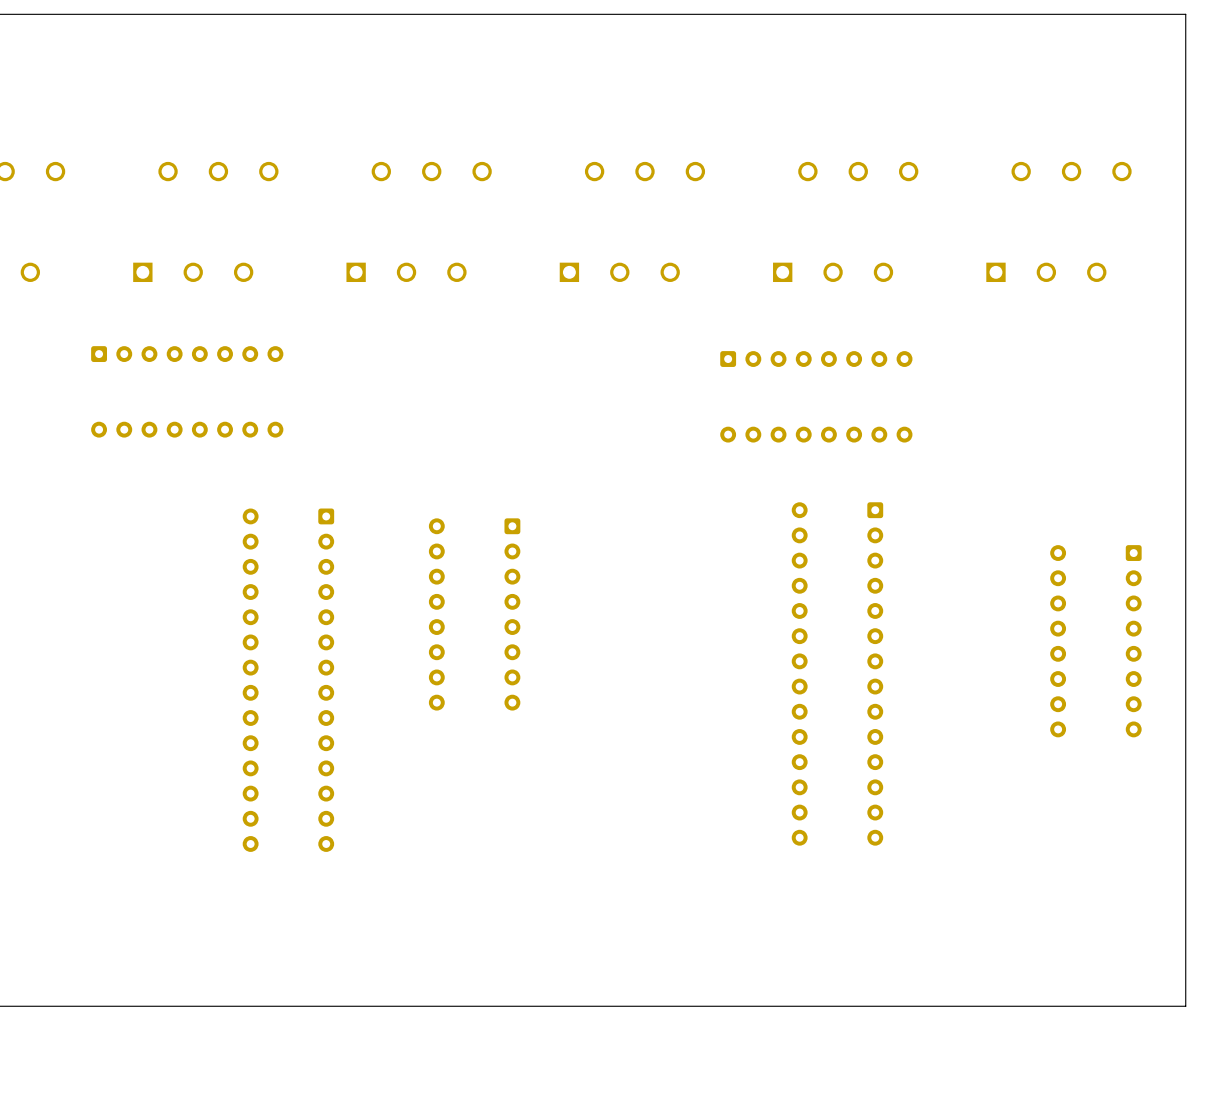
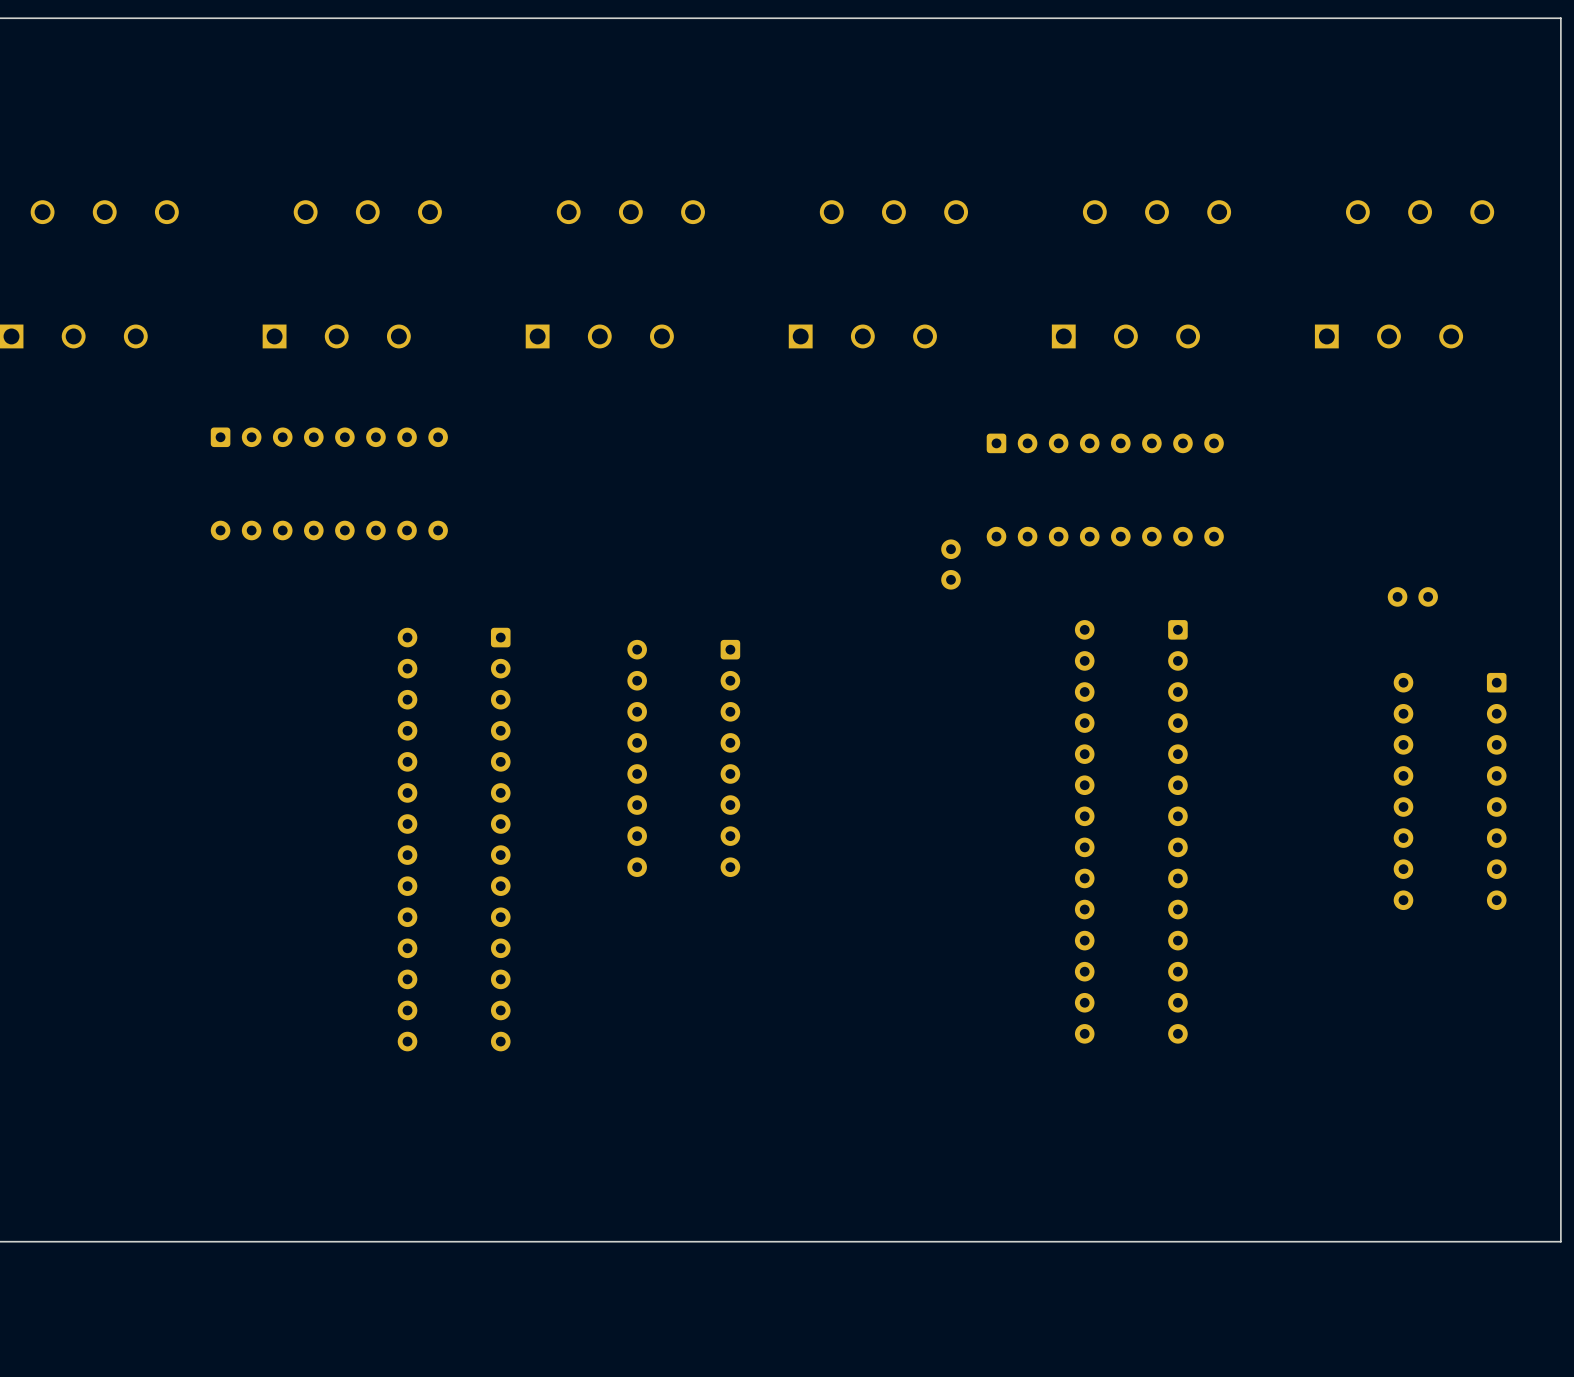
part: none -> (950, 564)
part: none -> (1412, 596)

